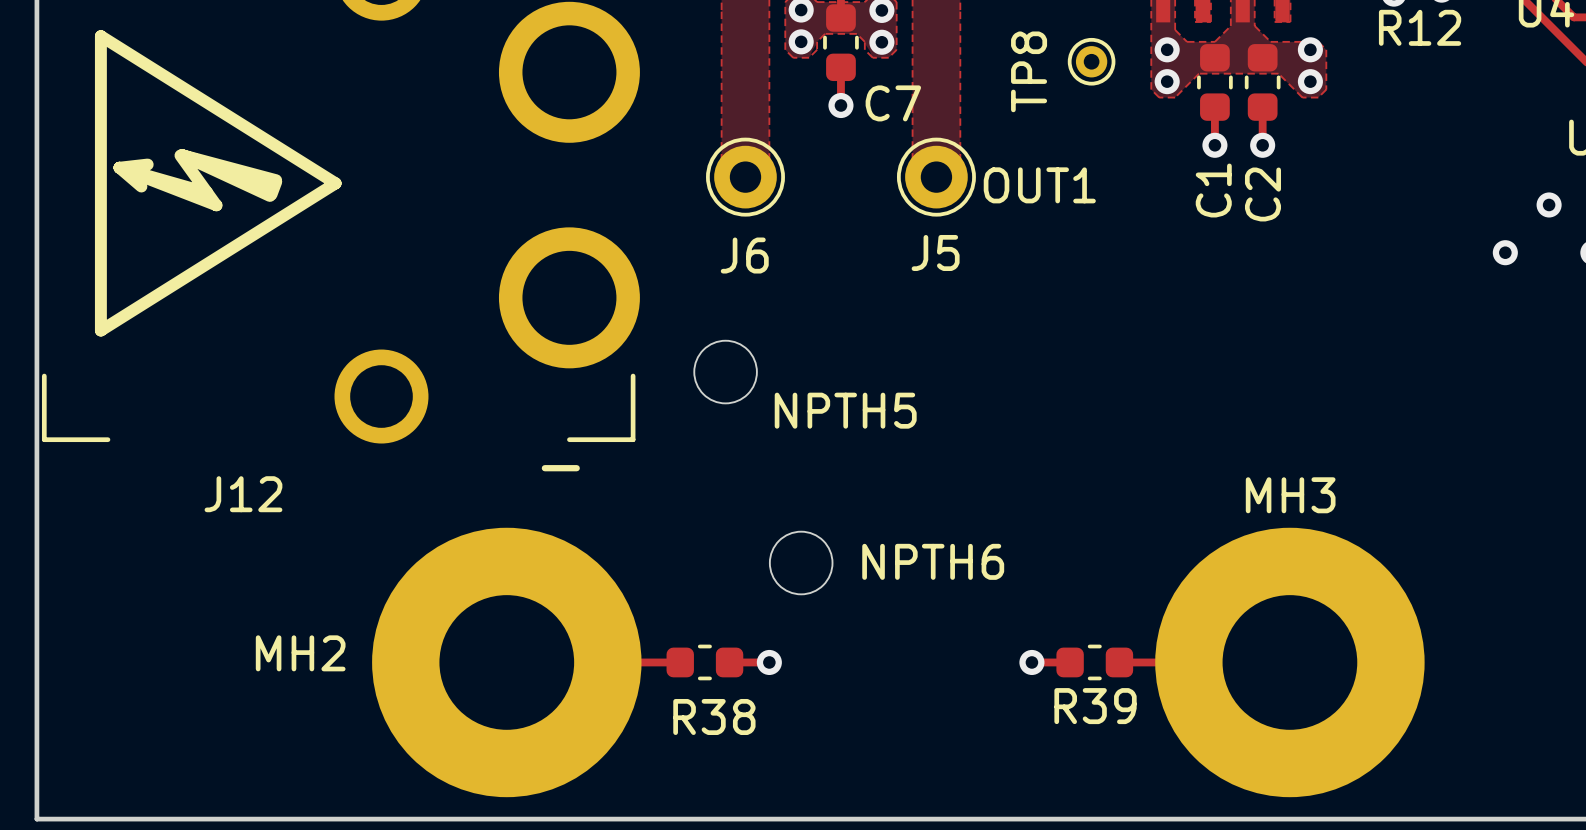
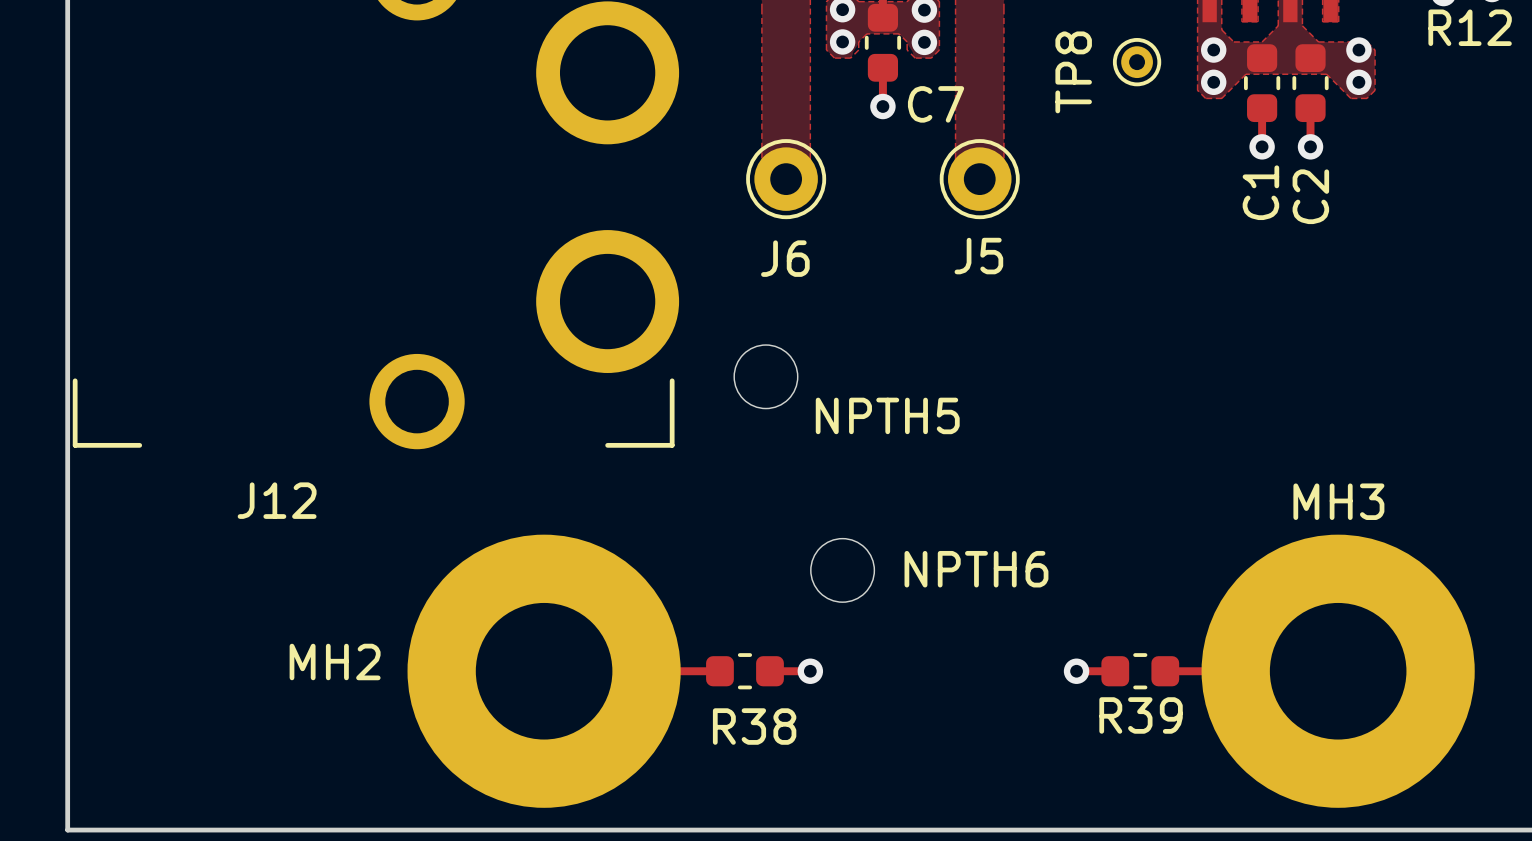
drawing: [94, 30, 342, 337] -> none
text: OUT1 (1039, 185) -> none
line: (544, 468) (576, 468) -> none

